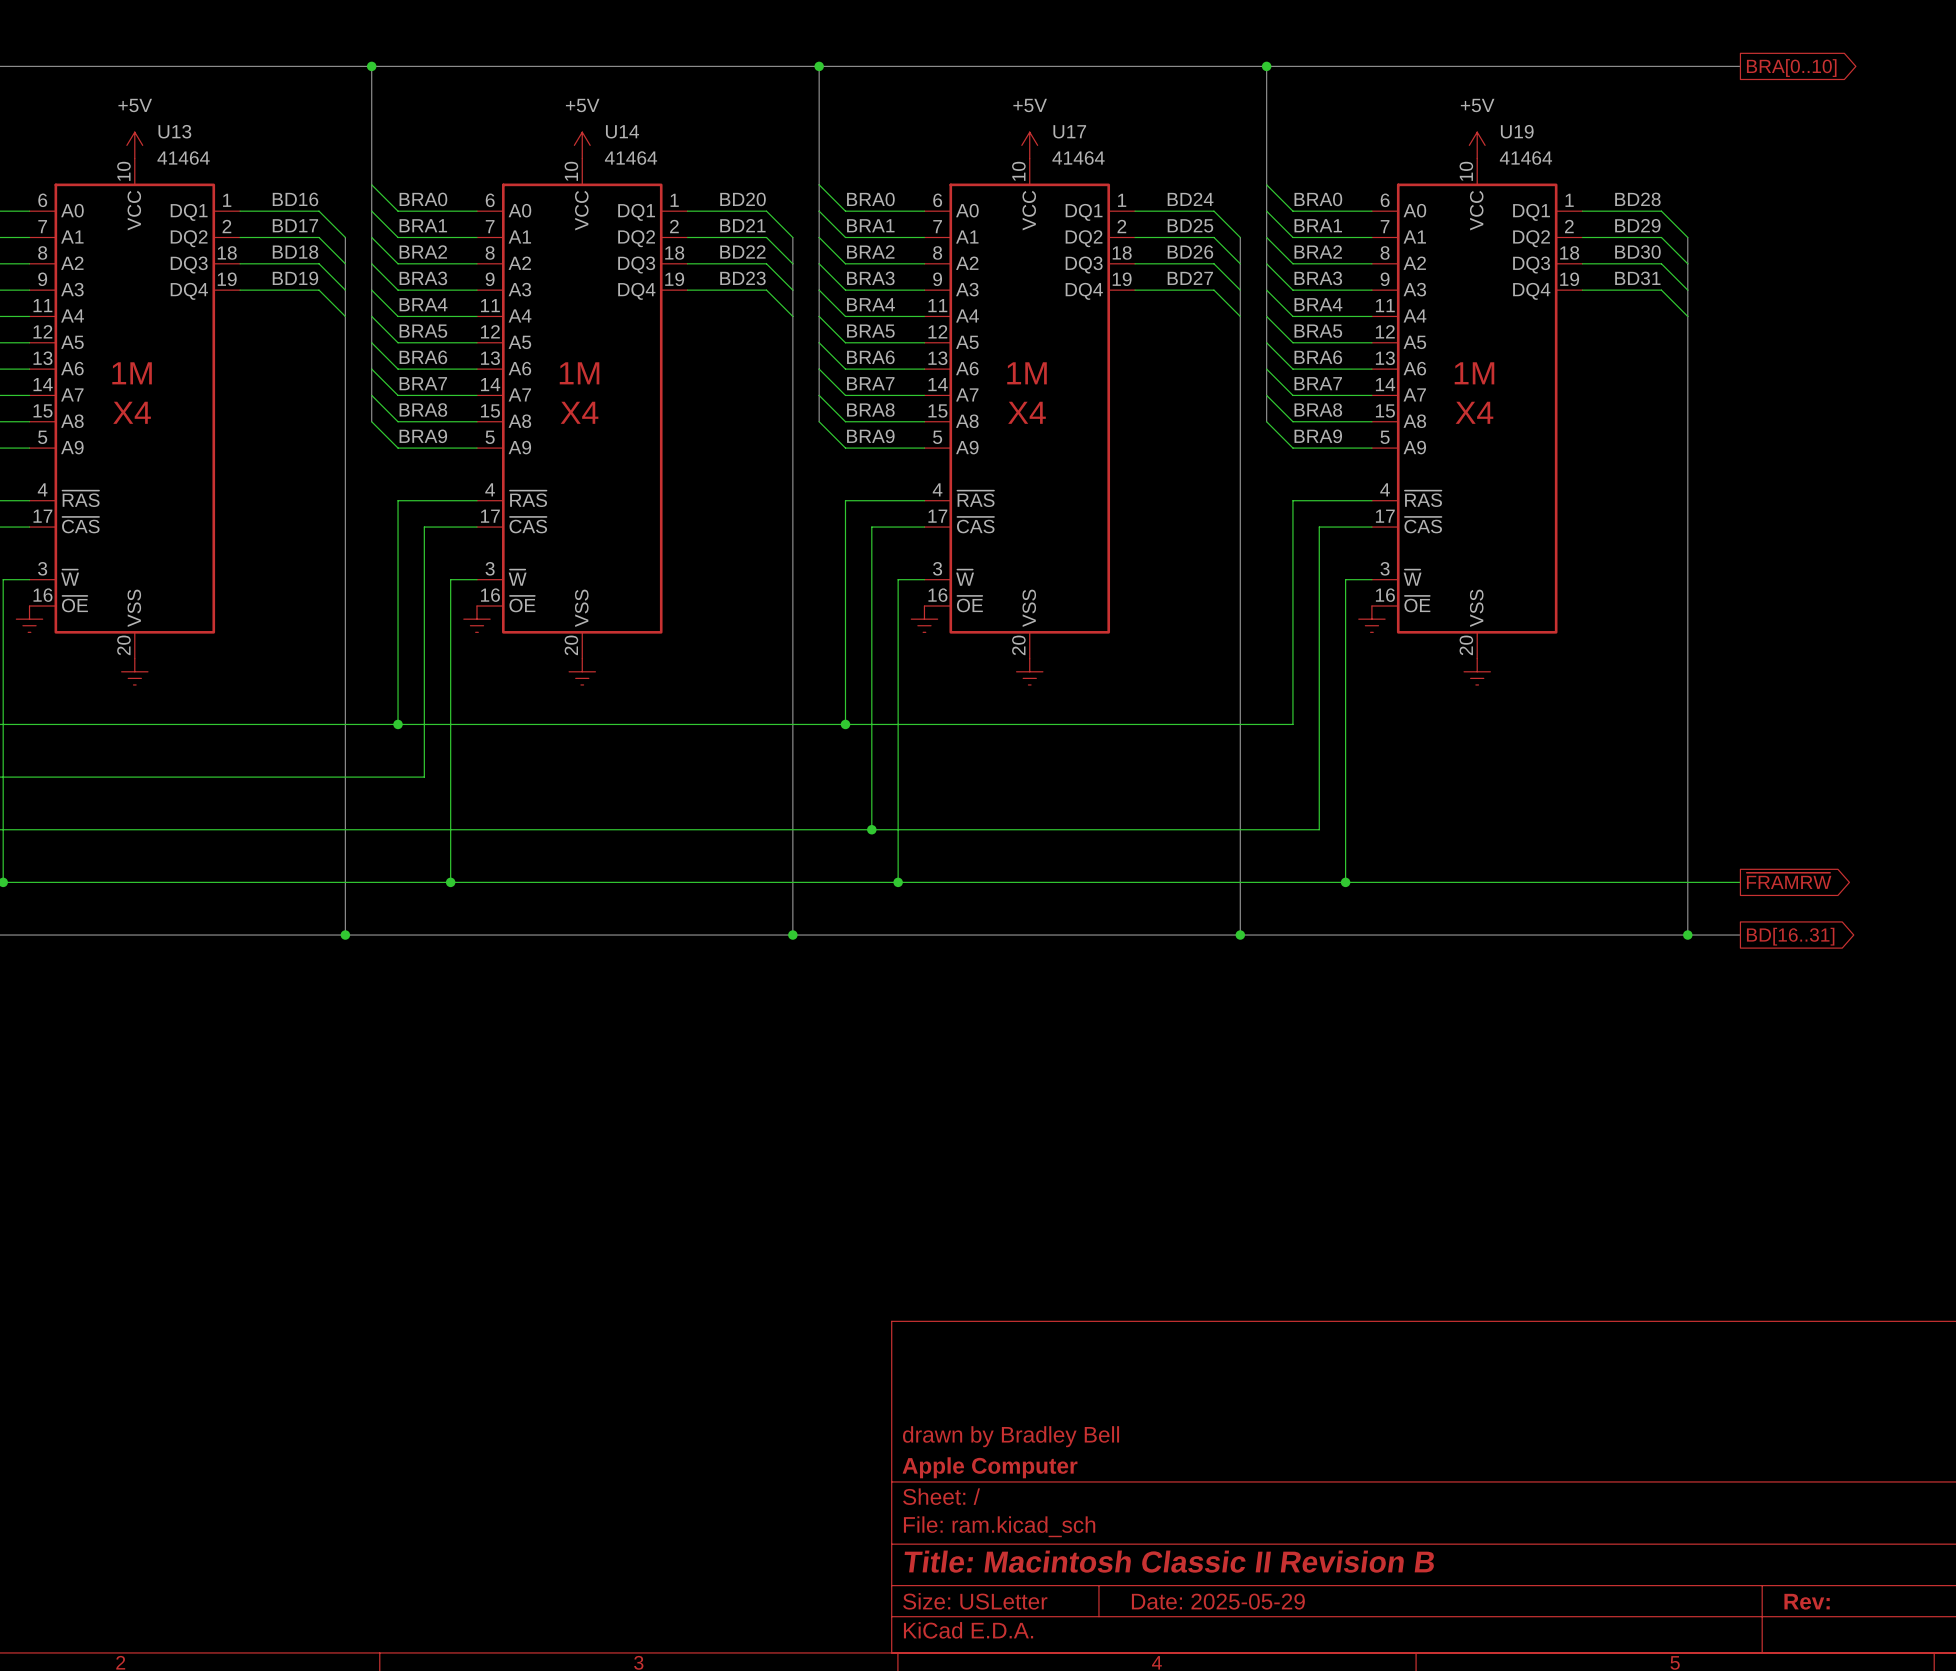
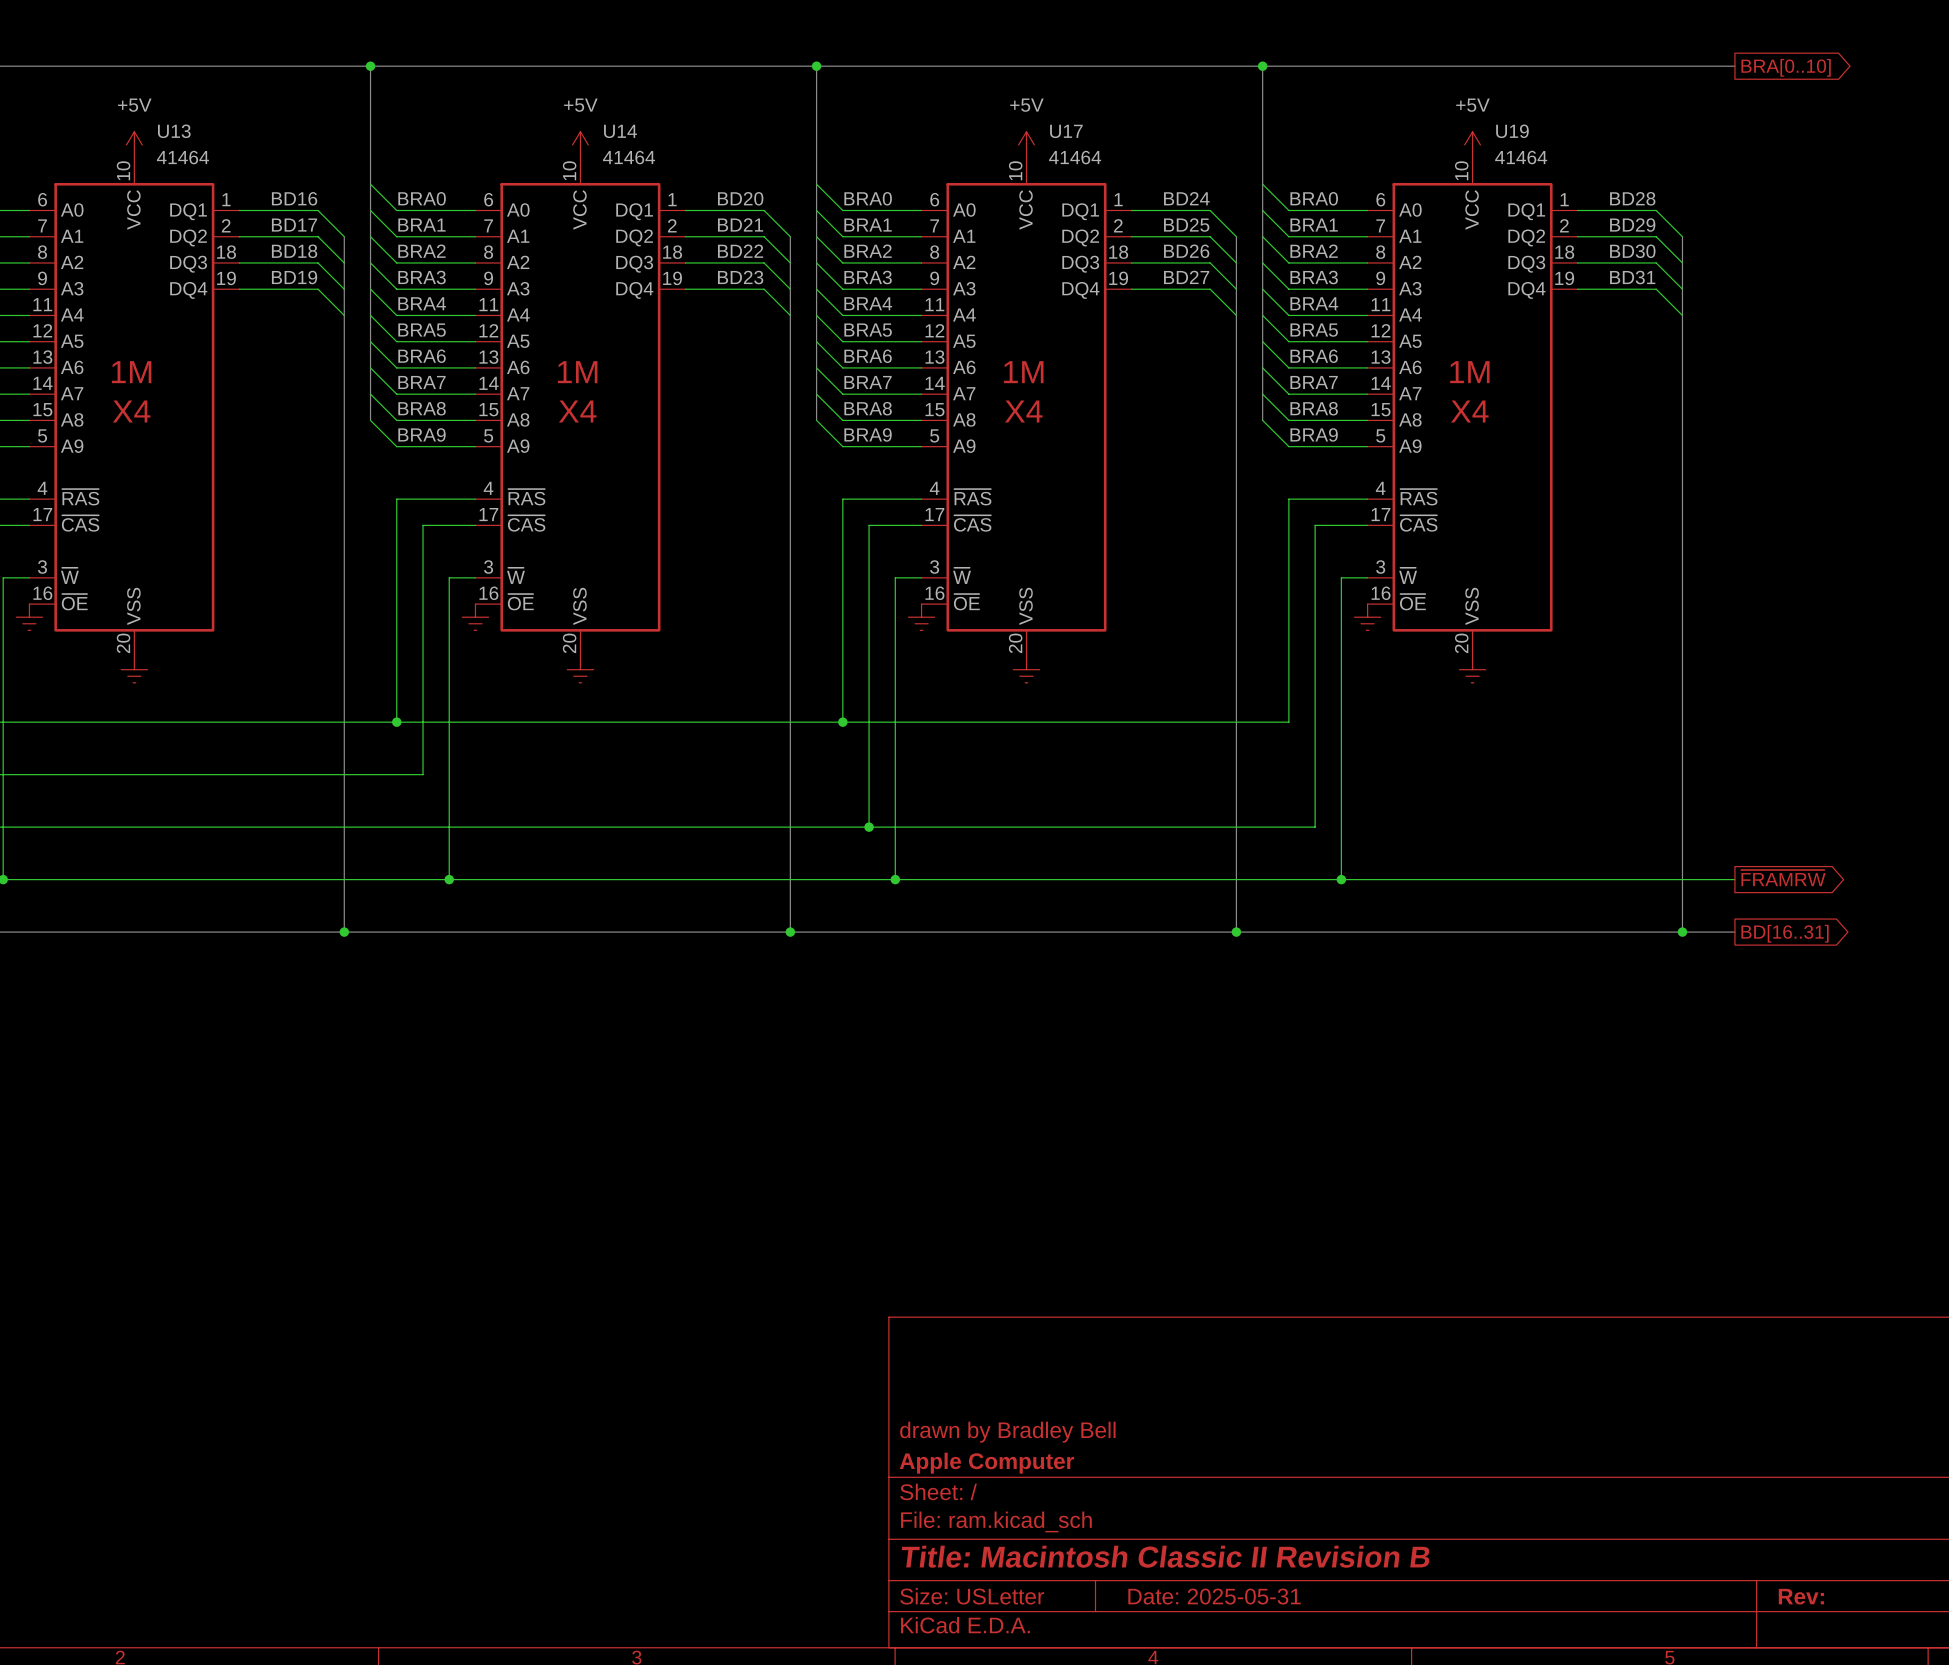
title block: Date: 2025-05-29 (1218, 1601) -> Date: 2025-05-31 (1214, 1596)

